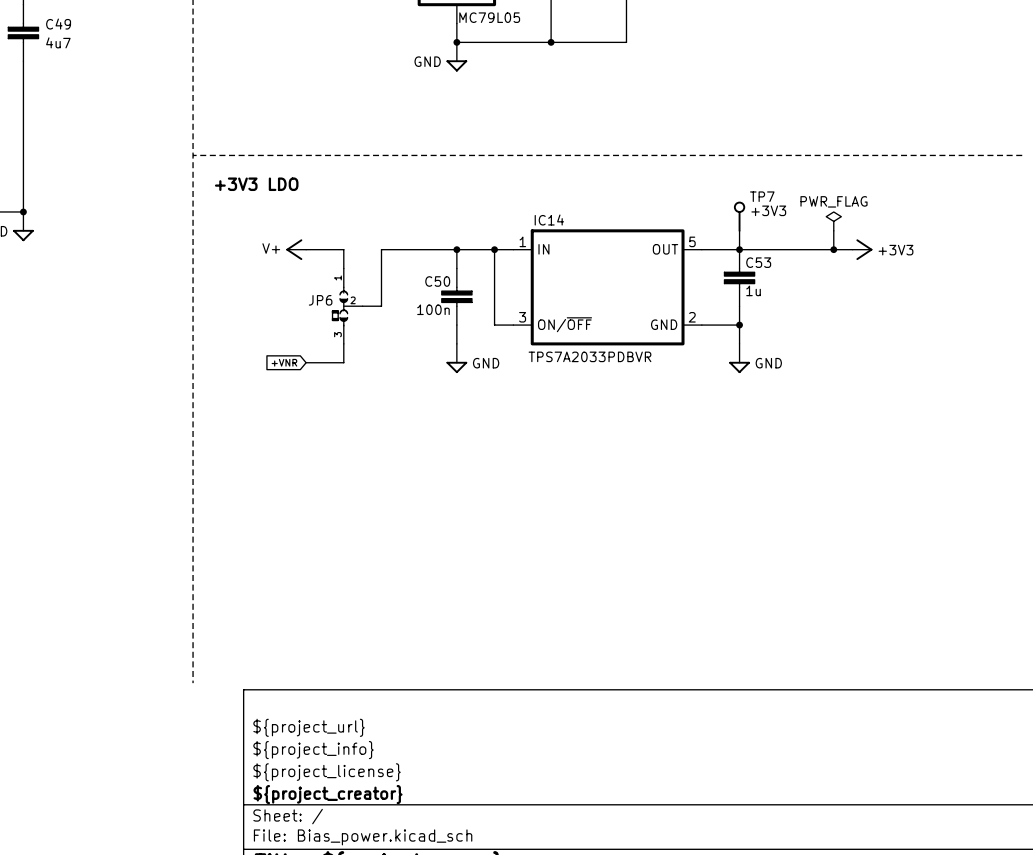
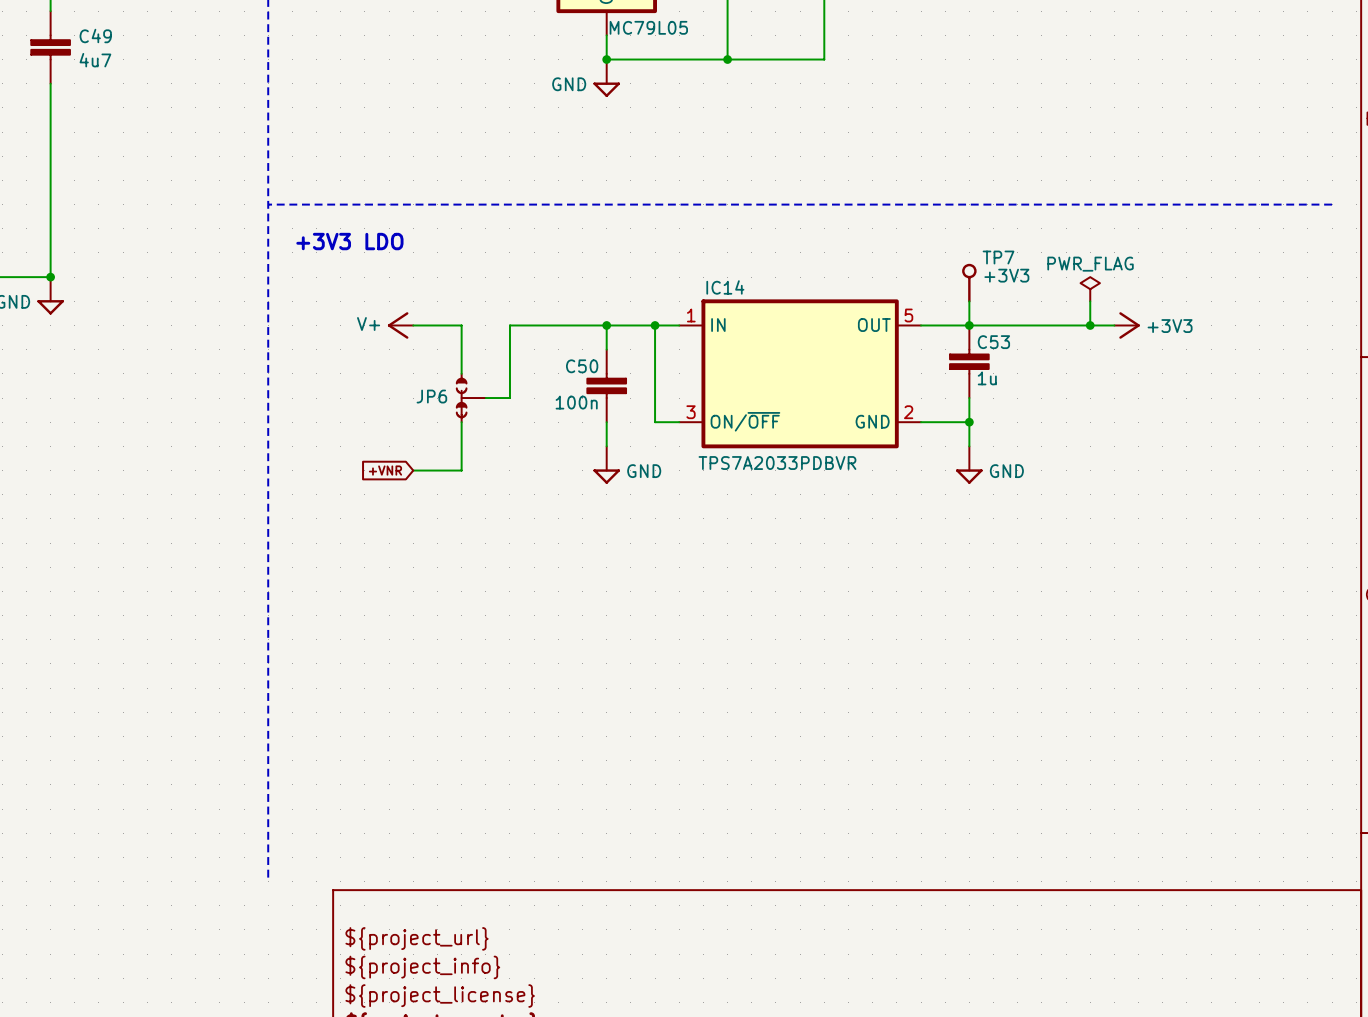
JP6 symbol: [332, 268, 363, 344] -> [456, 373, 486, 423]

